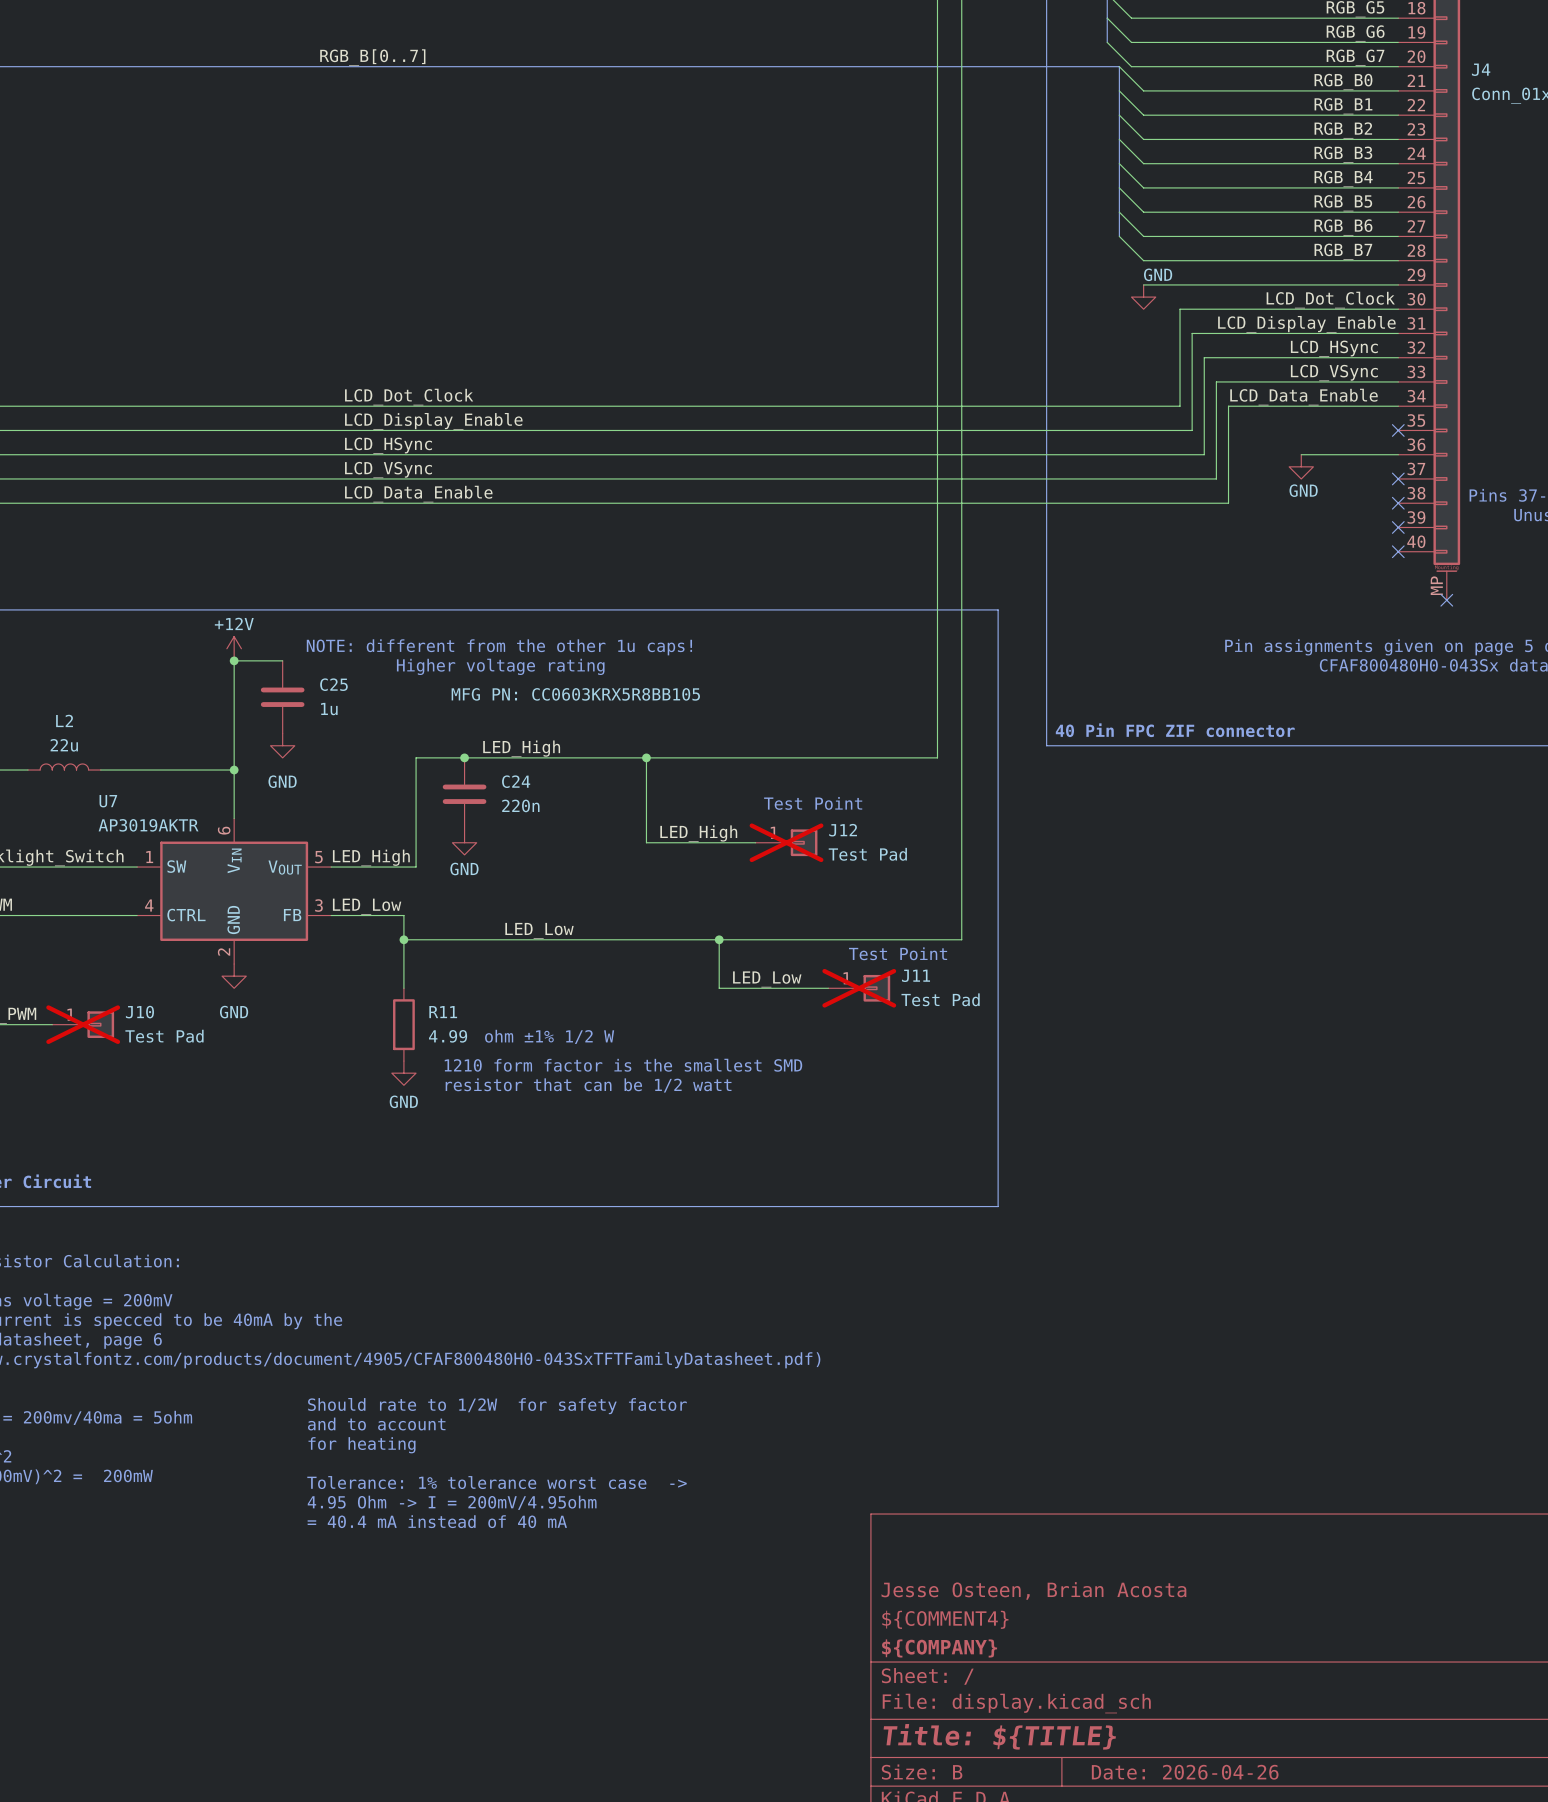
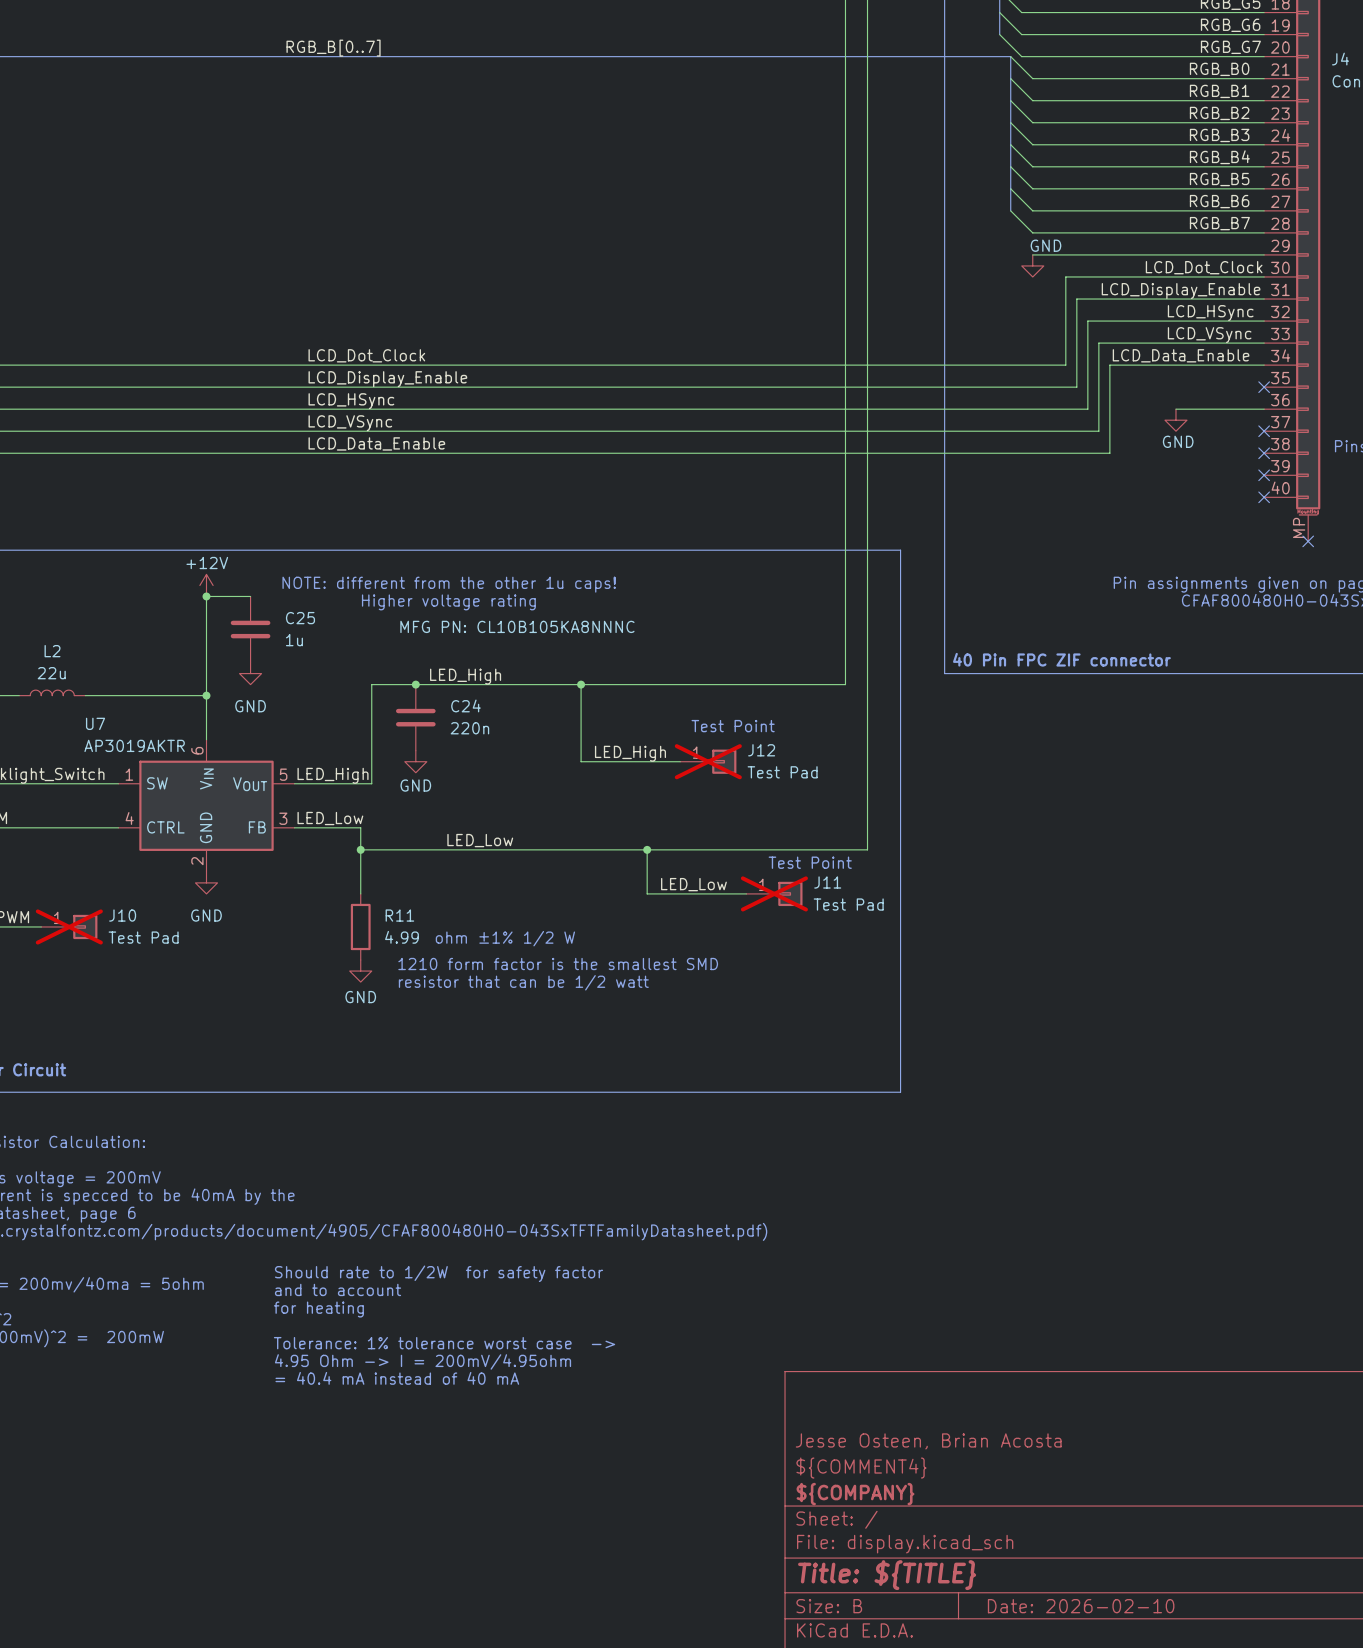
C25 text: MFG PN: CC0603KRX5R8BB105 (575, 694) -> MFG PN: CL10B105KA8NNNC (517, 626)
title block: Date: 2026-04-26 (1185, 1772) -> Date: 2026-02-10 (1081, 1606)

